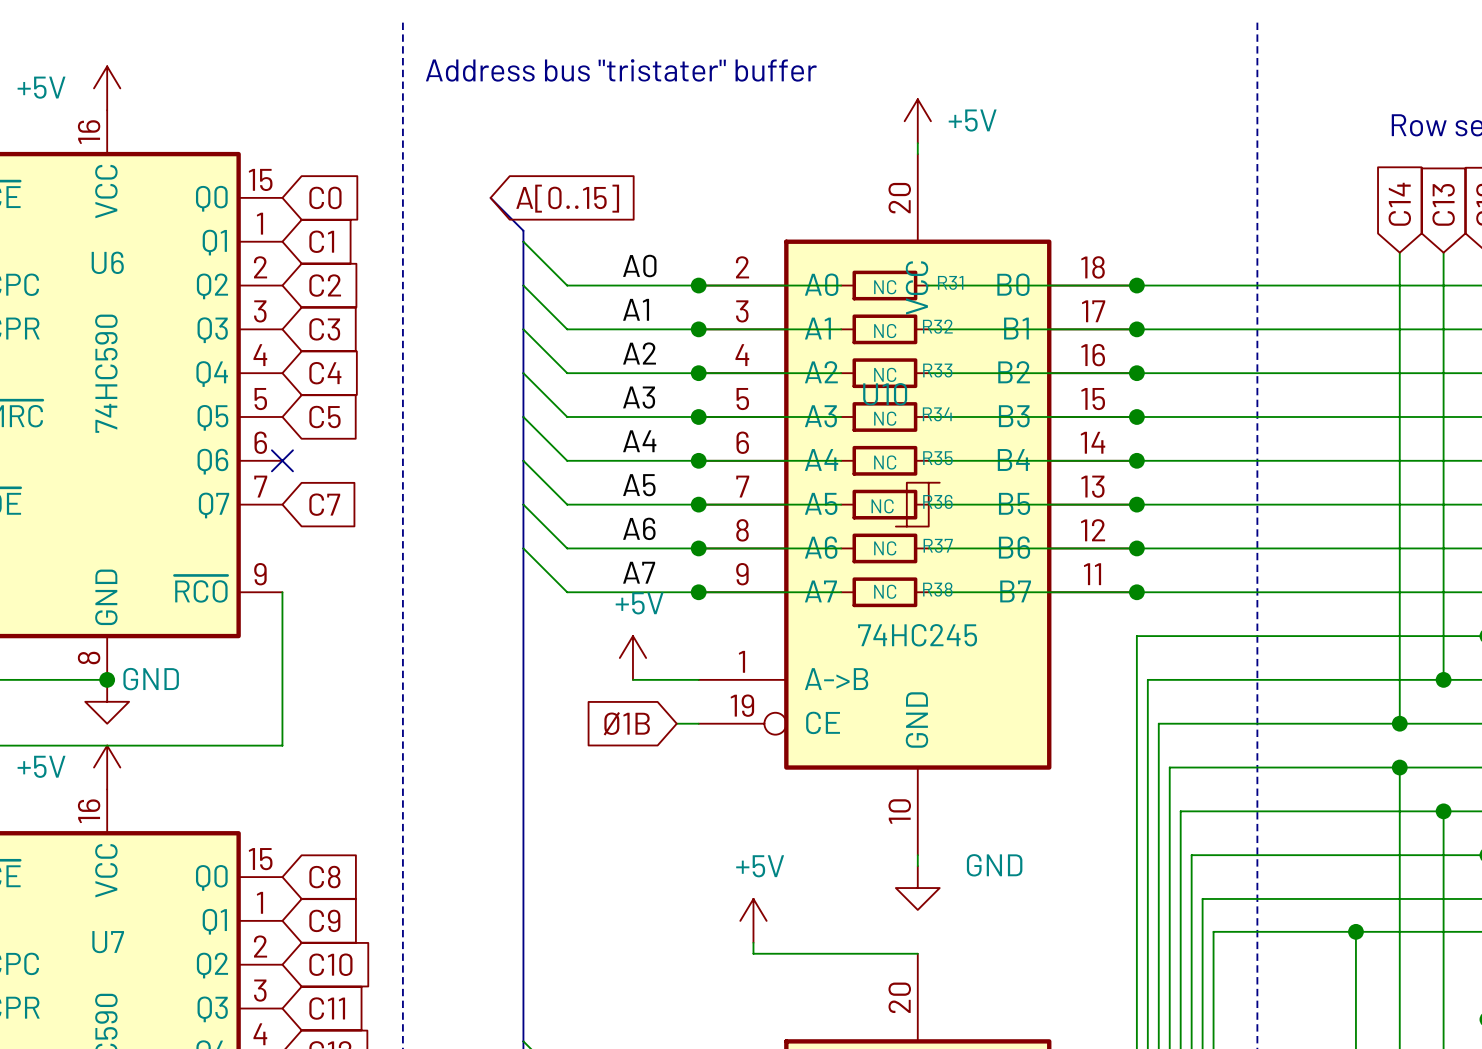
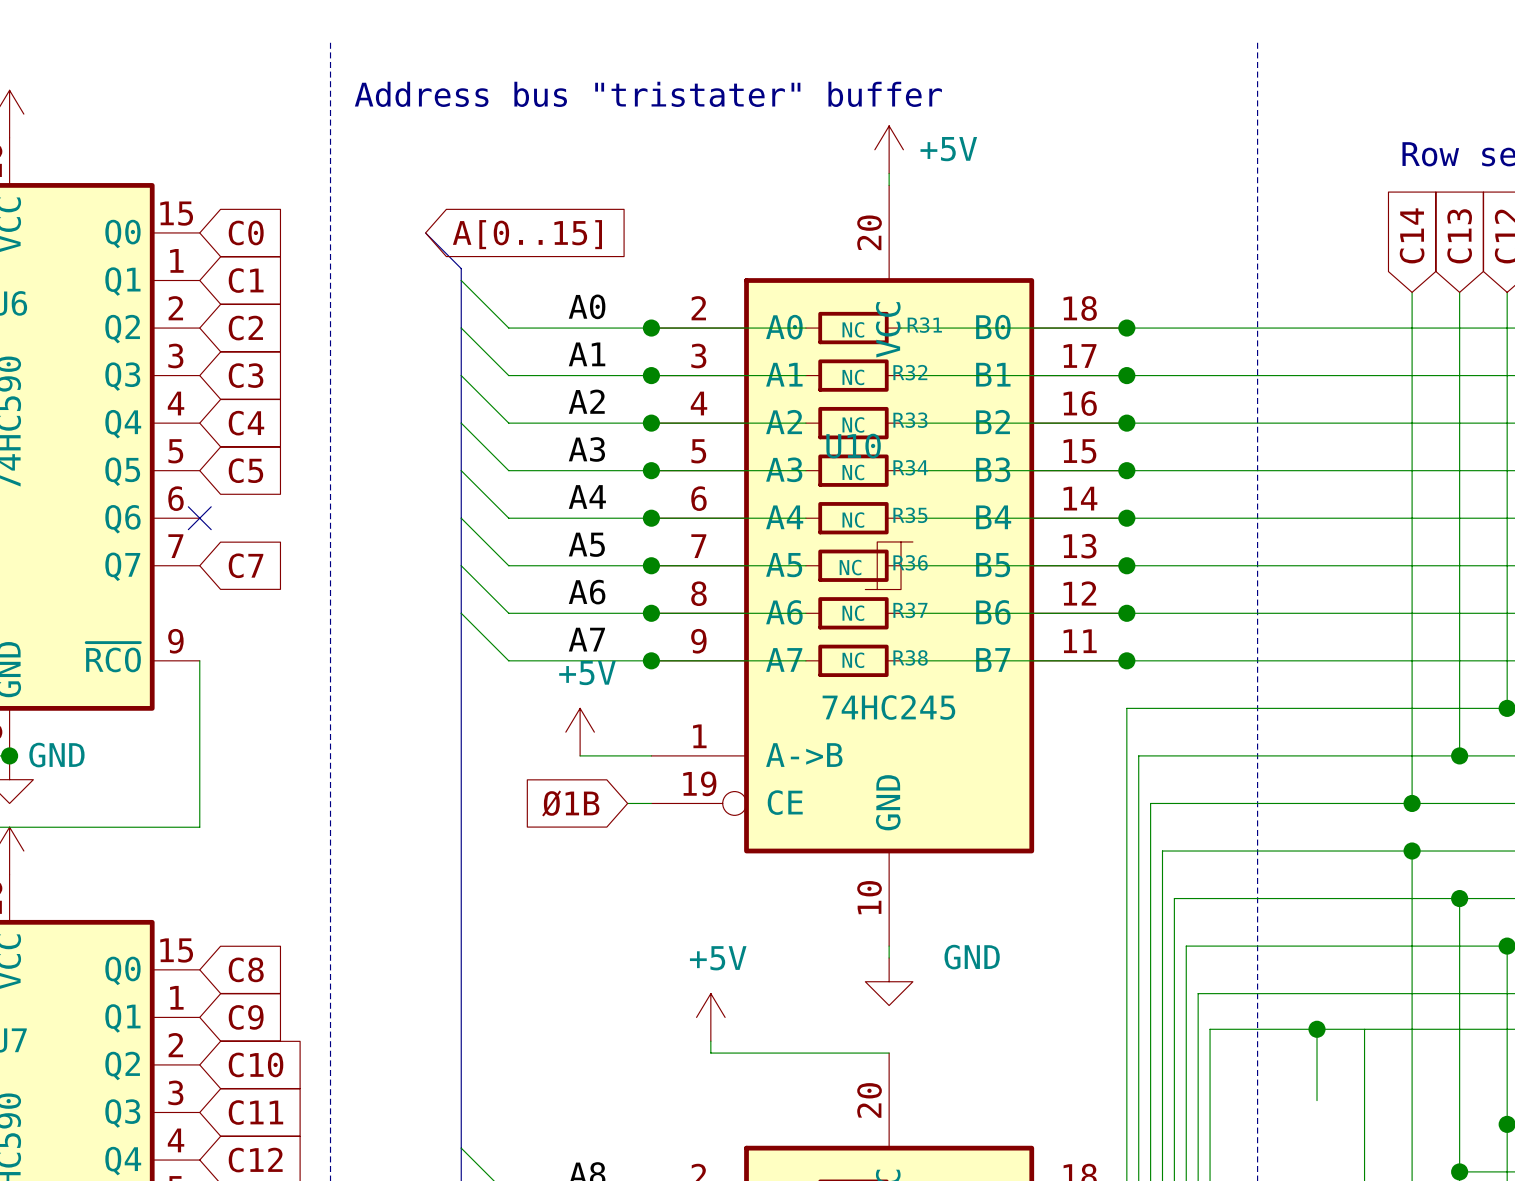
wire: none -> (1317, 1029) (1317, 1100)
junction position: (1355, 931) -> (1317, 1029)

